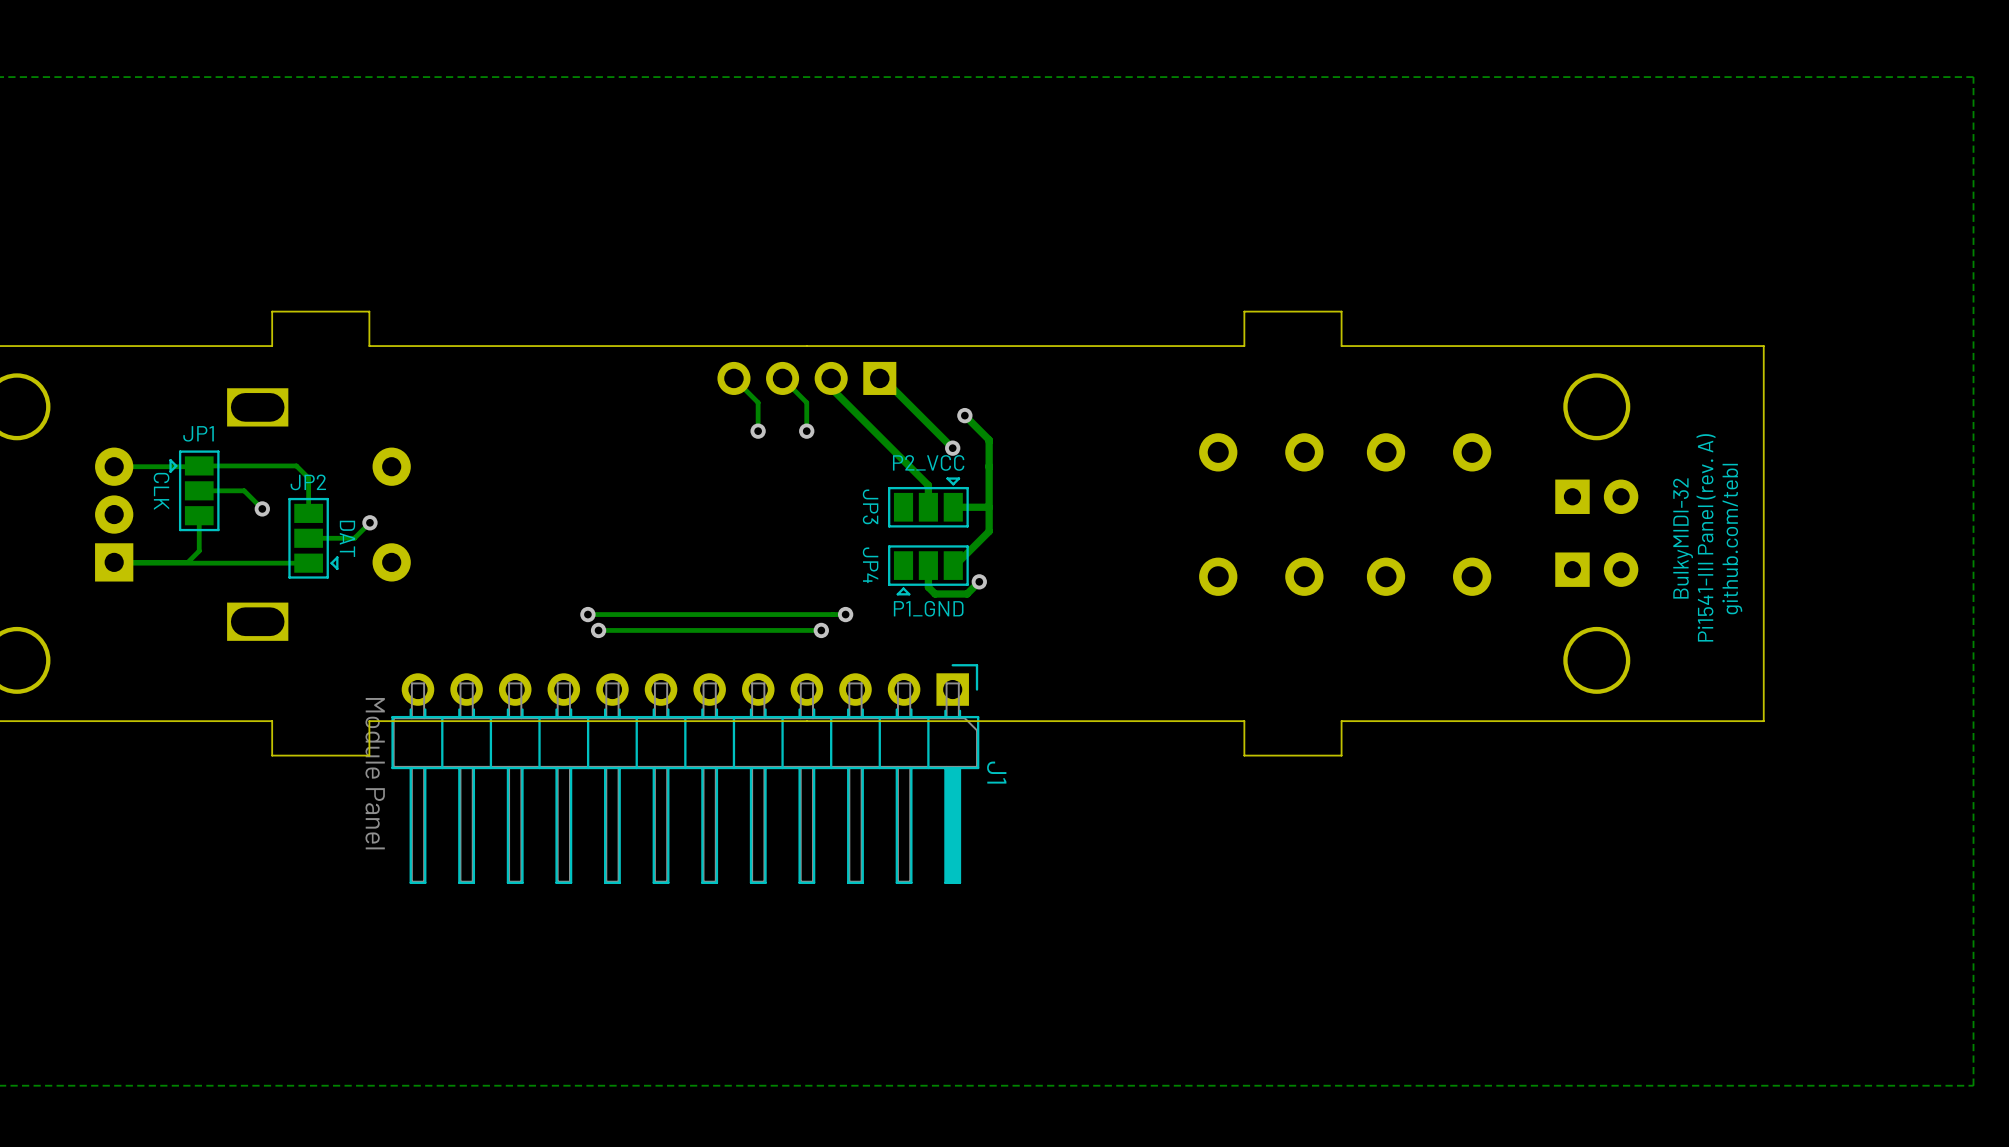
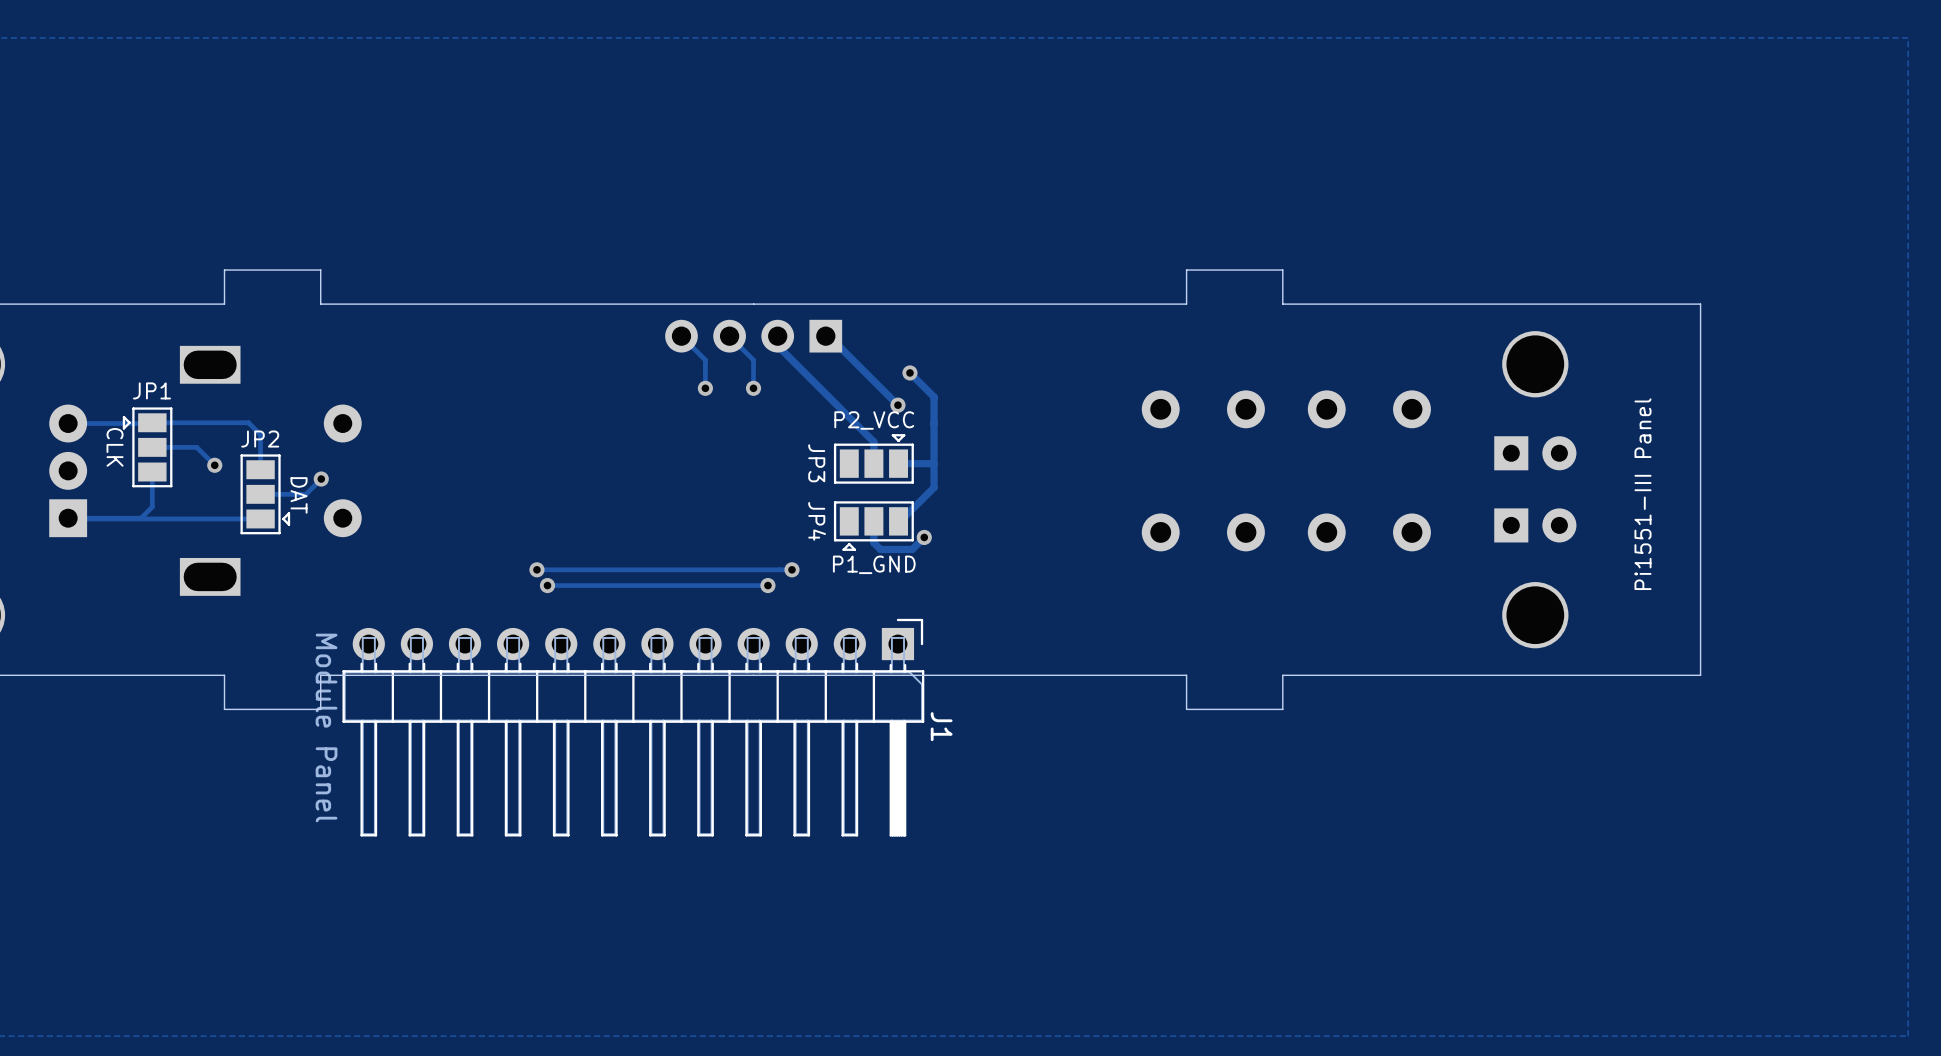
text: Pi1541-III Panel (rev. A) (1706, 537) -> Pi1551-III Panel (1643, 494)
text: BulkyMIDI-32 (1683, 538) -> none
text: github.com/tebl (1732, 539) -> none

